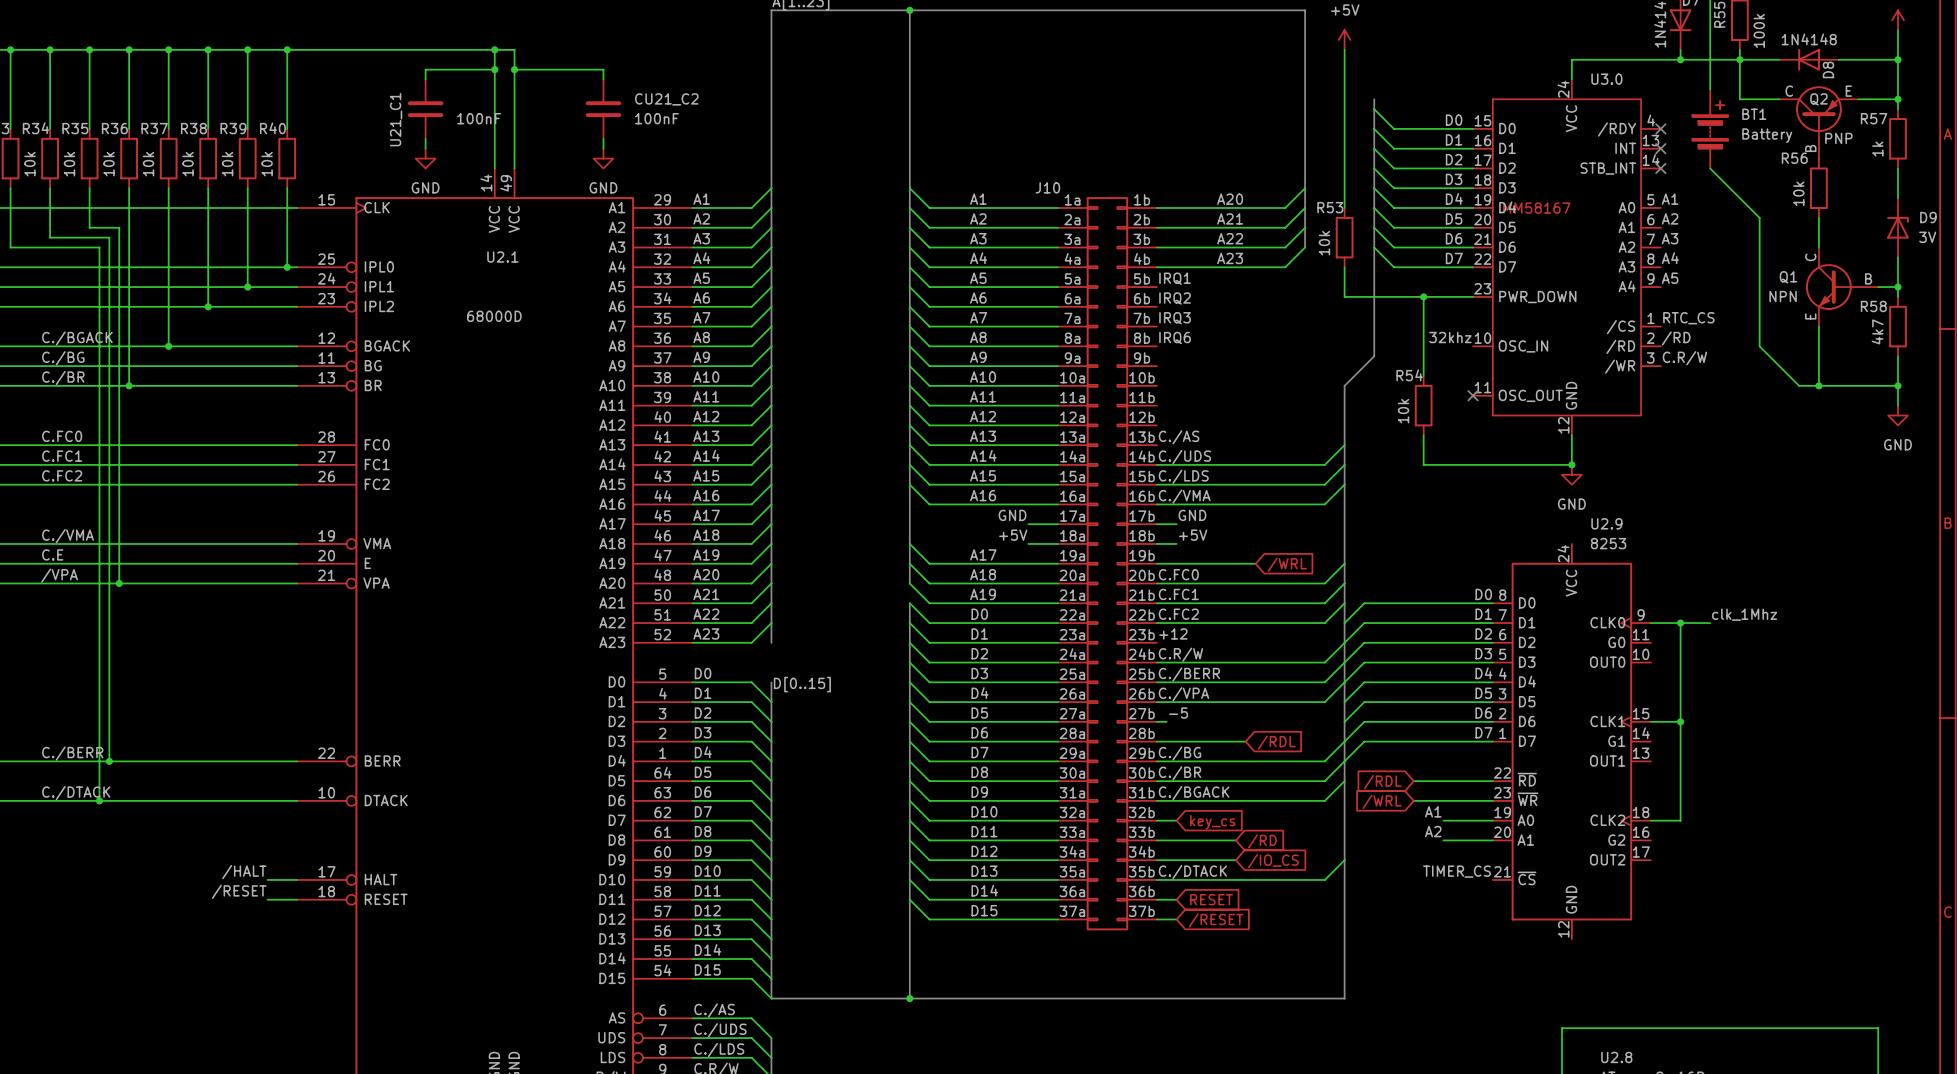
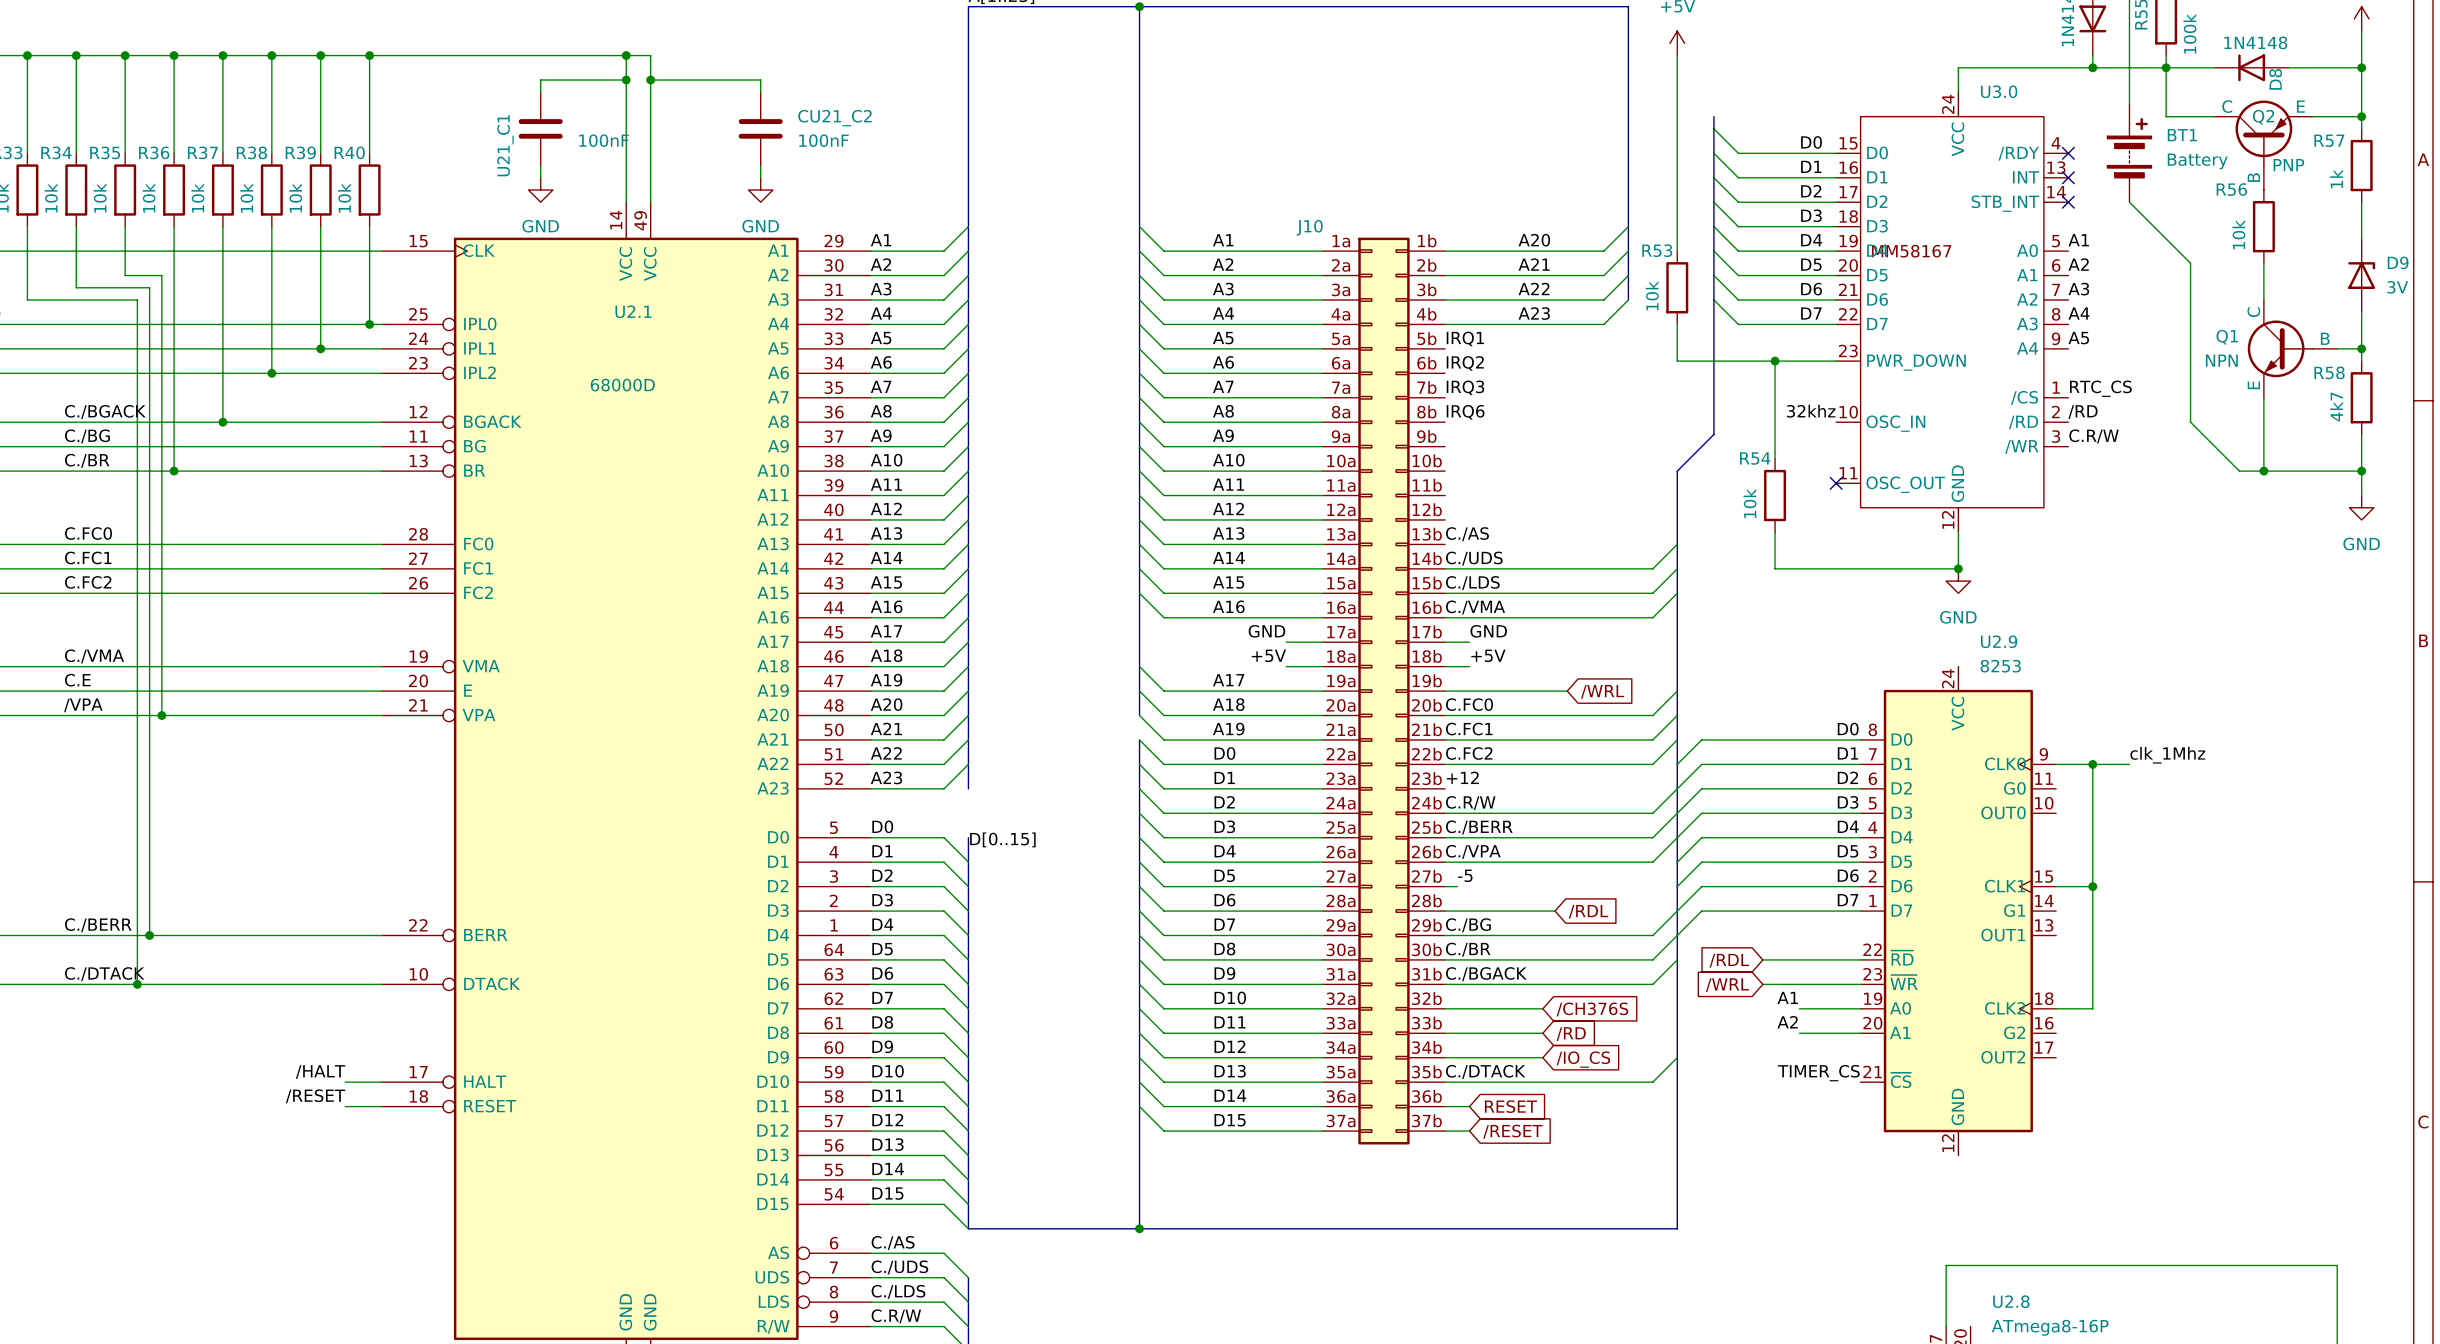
wire: none -> (1469, 1008) (1542, 1008)
global label: none -> /CH376S (1592, 1009)
global label: key_cs (1212, 822) -> none

